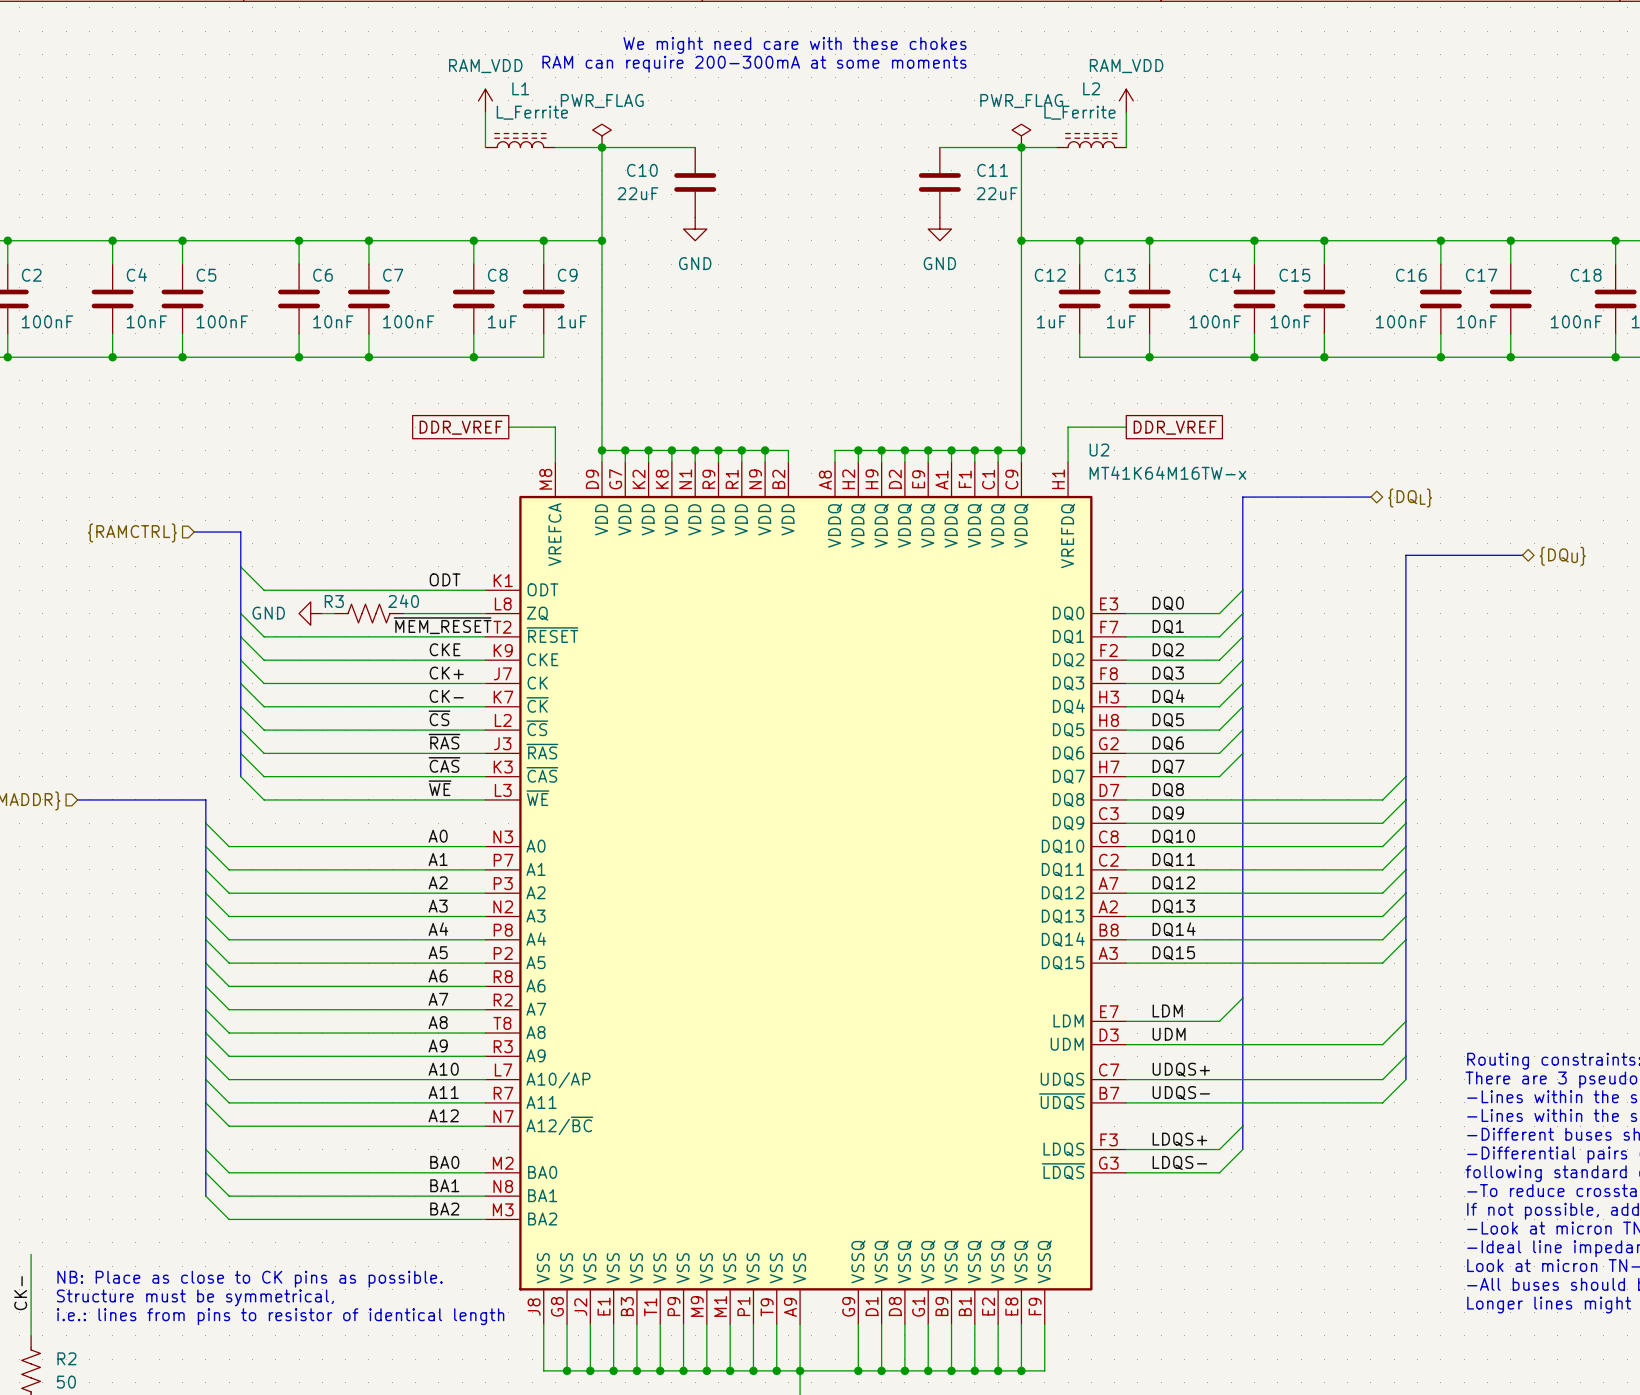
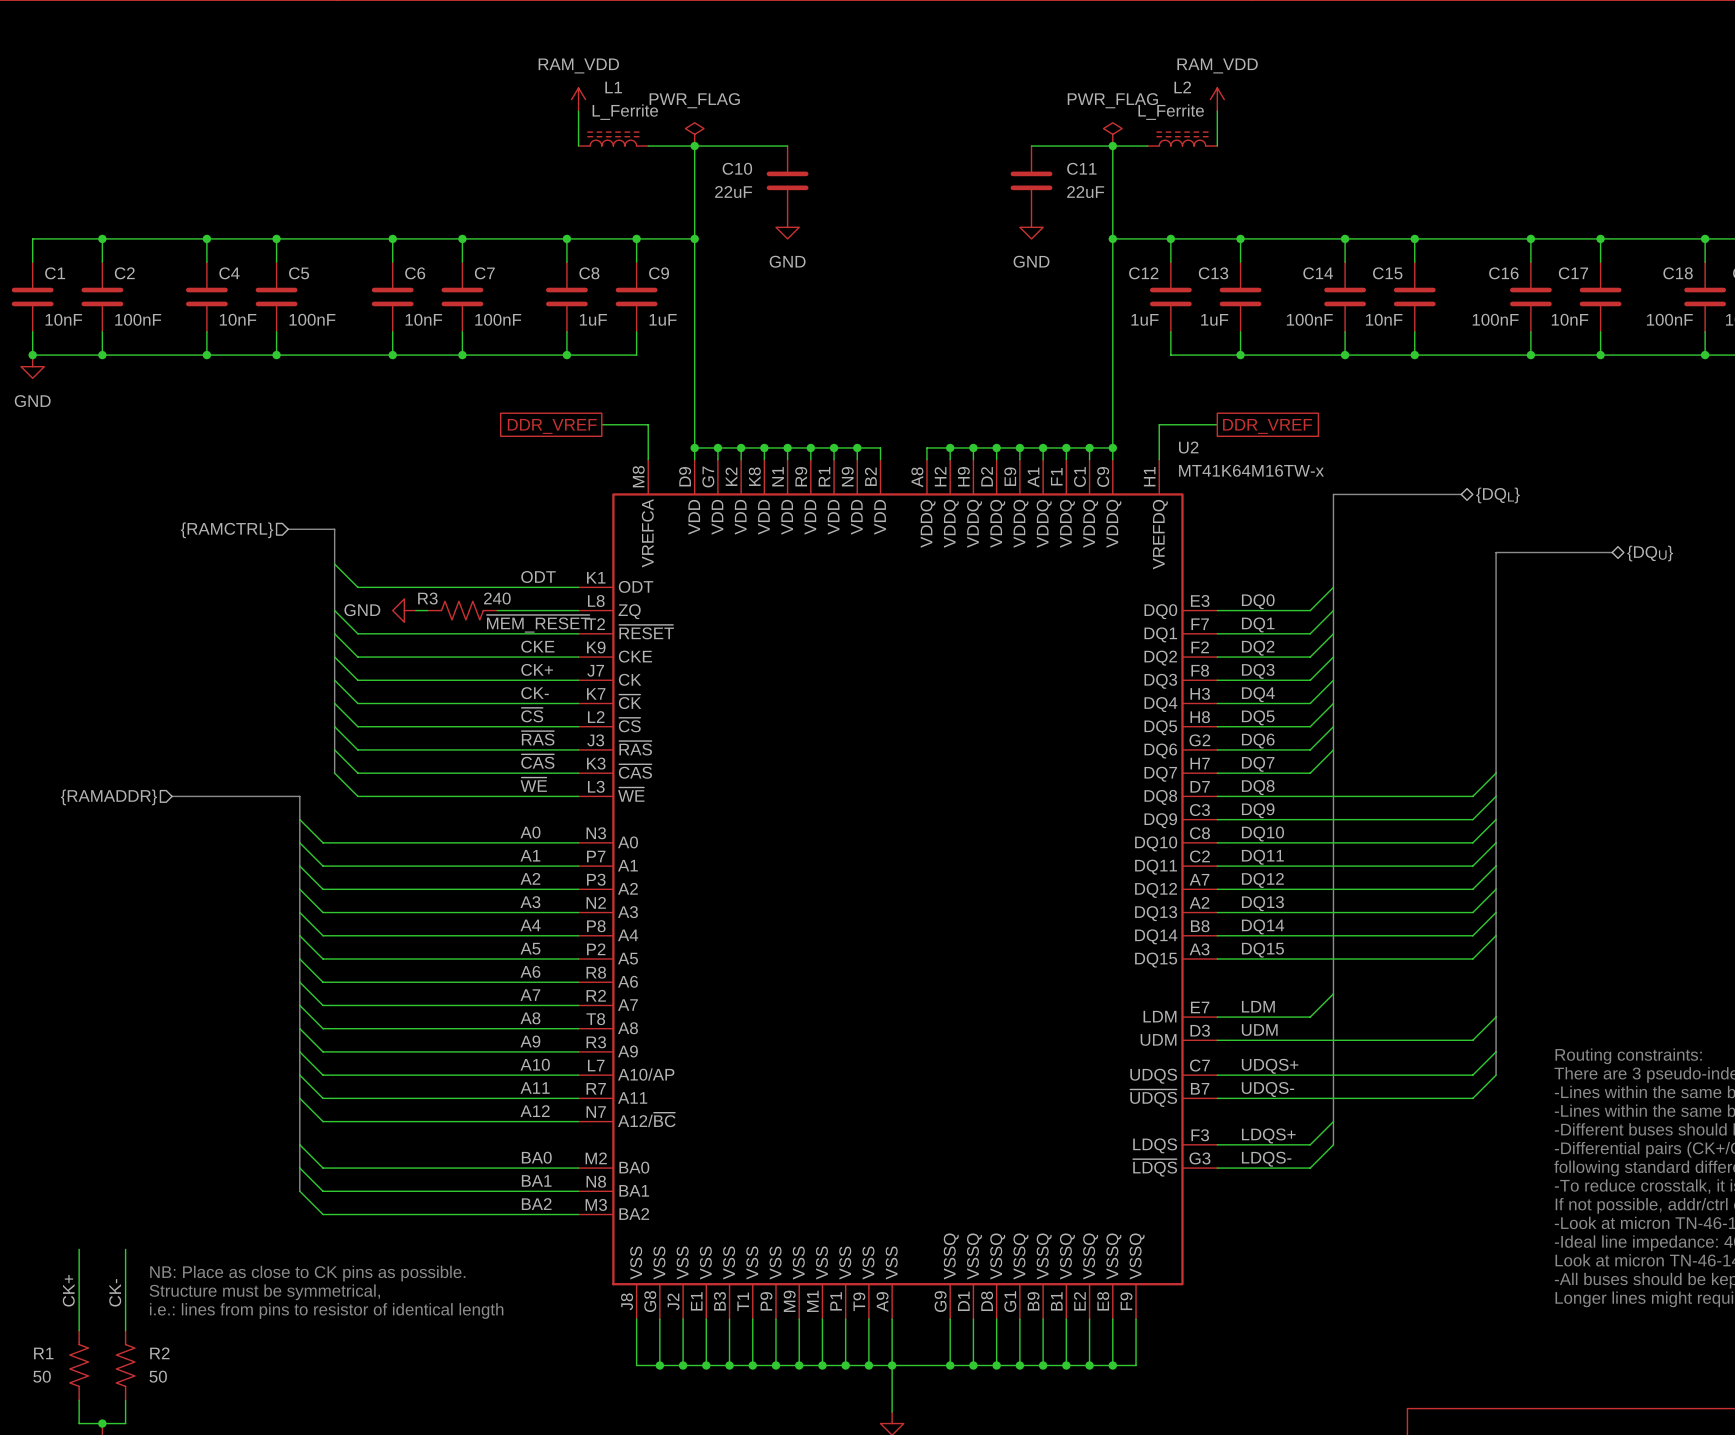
text: We might need care with these chokes (794, 45) -> none
text: RAM can require 200-300mA at some moments (754, 64) -> none

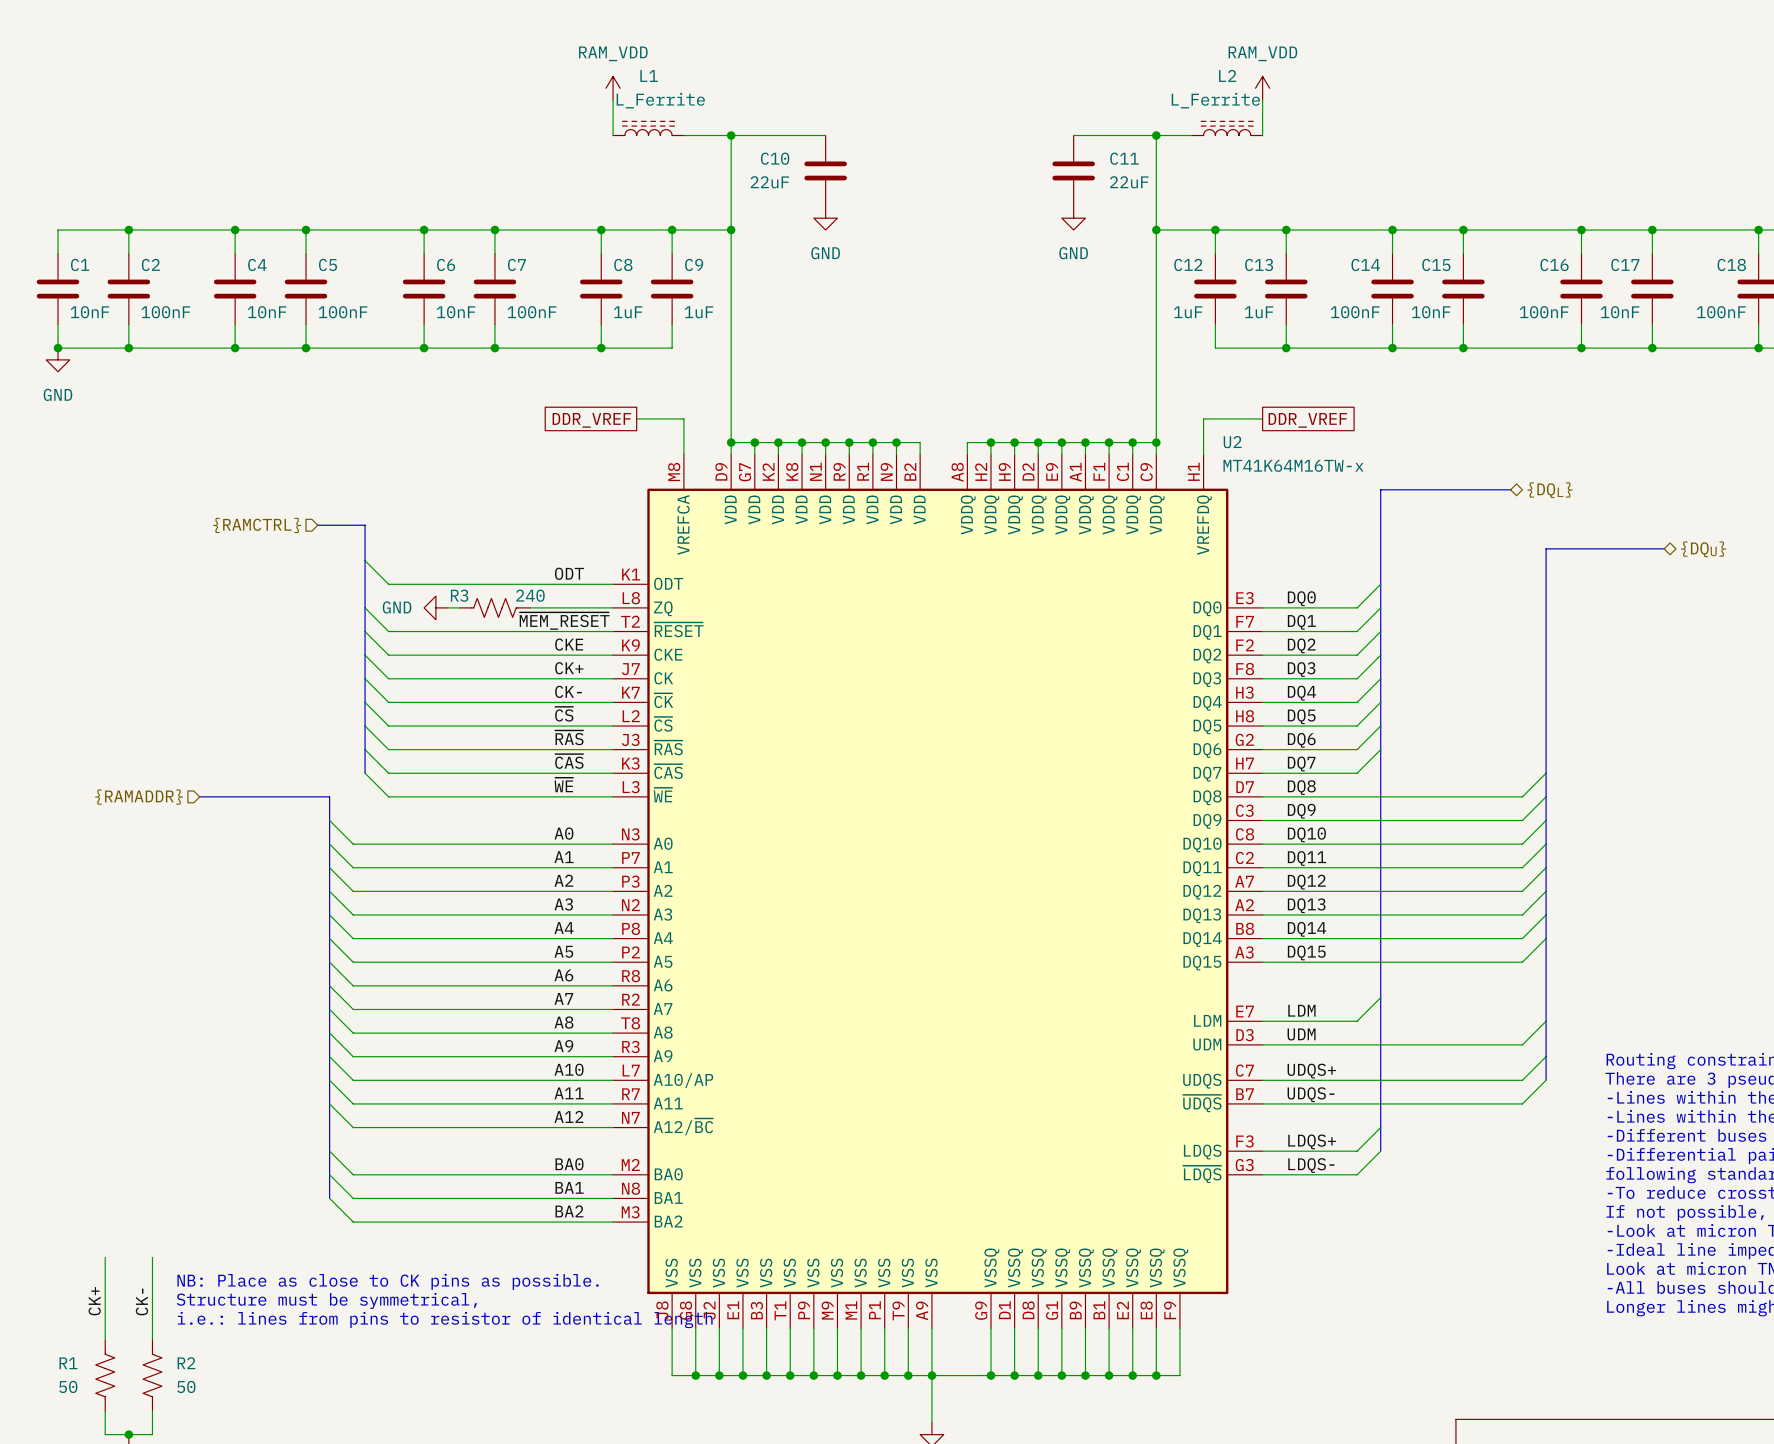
power symbol: PWR_FLAG (694, 134) -> none
power symbol: PWR_FLAG (1112, 134) -> none

